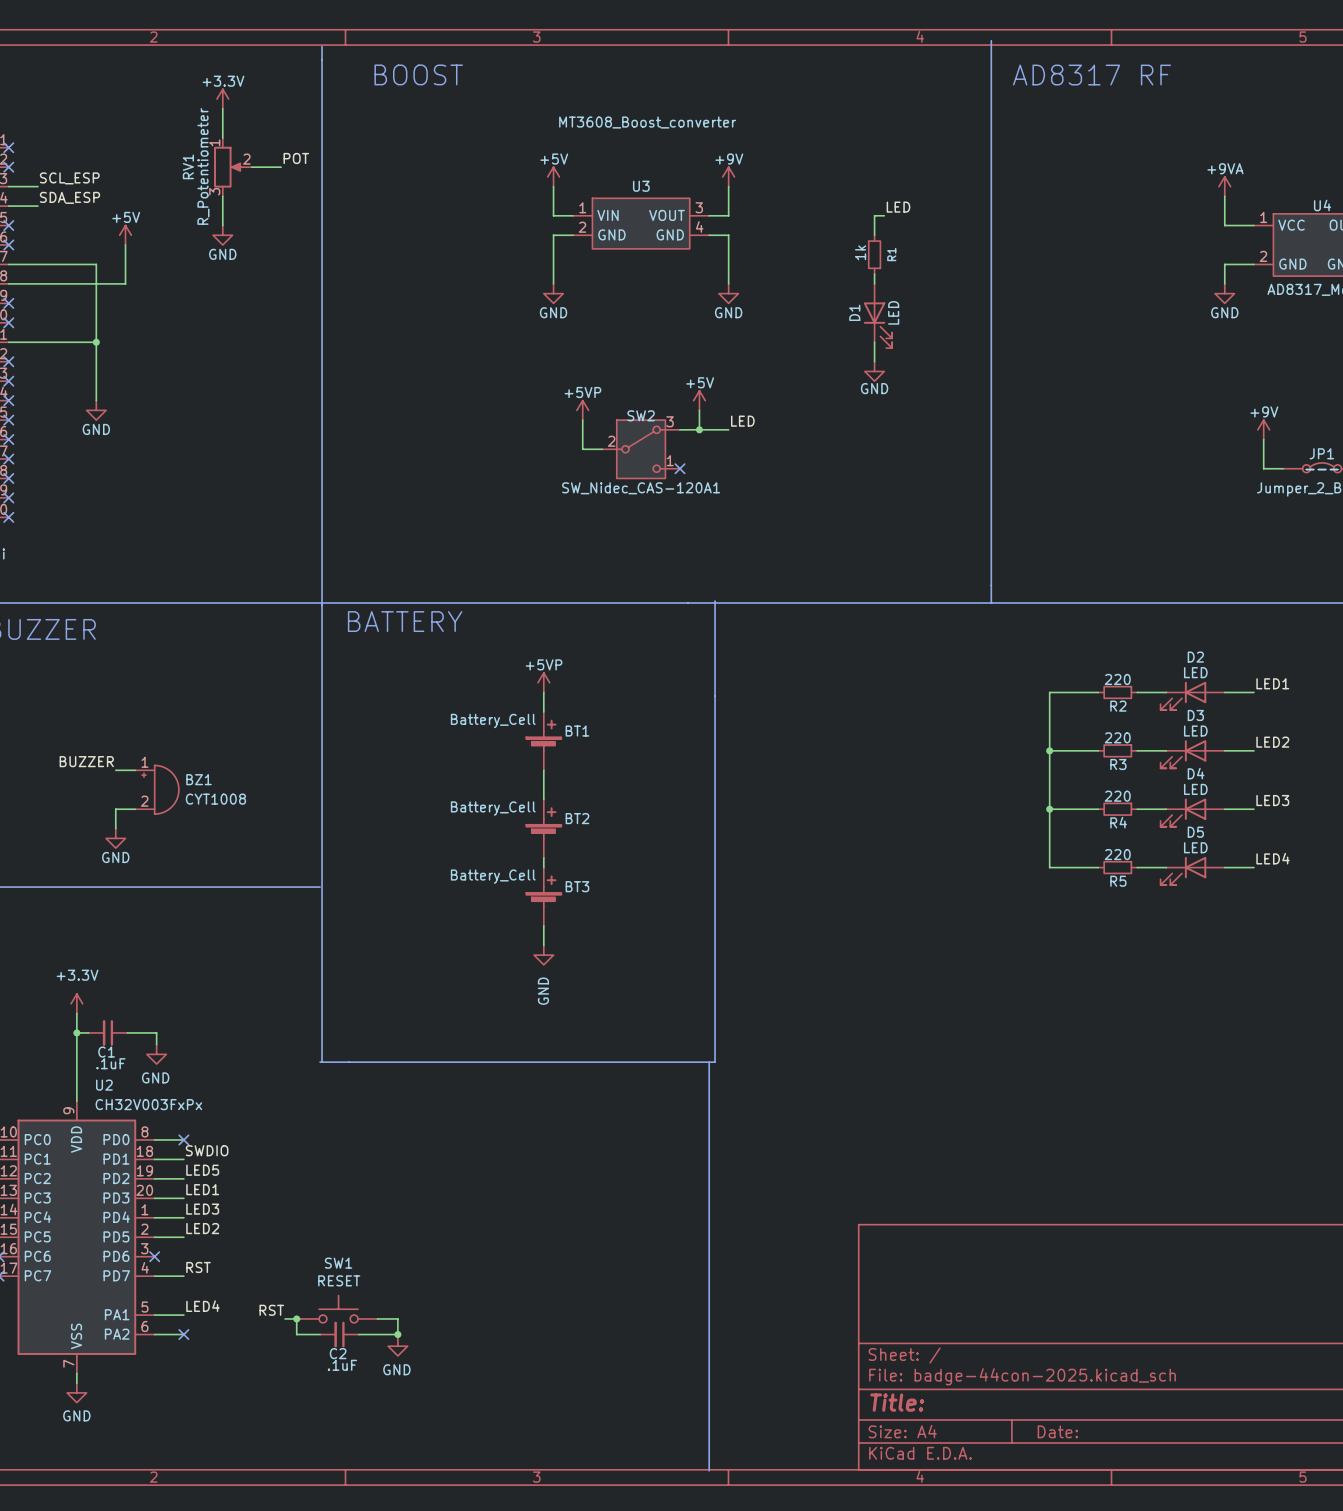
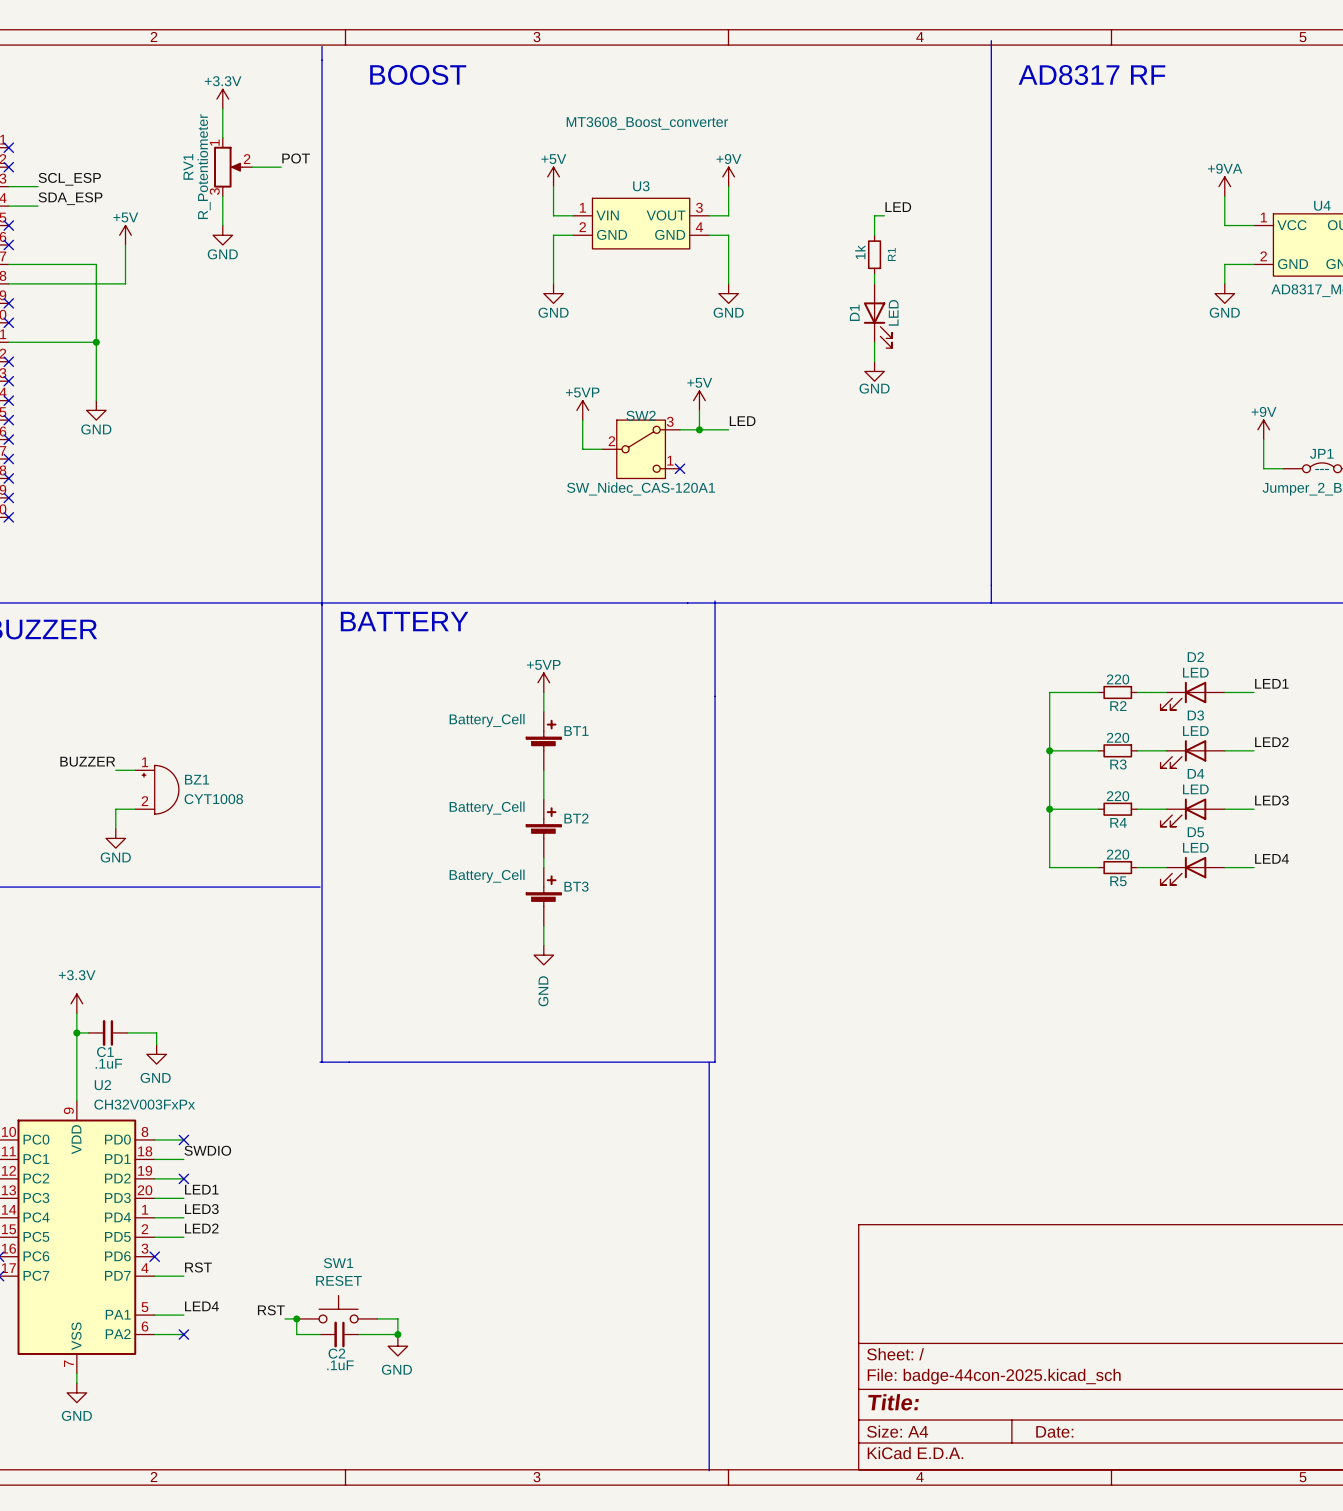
label: LED5 (202, 1170) -> none
no-connect mark: none -> (183, 1178)

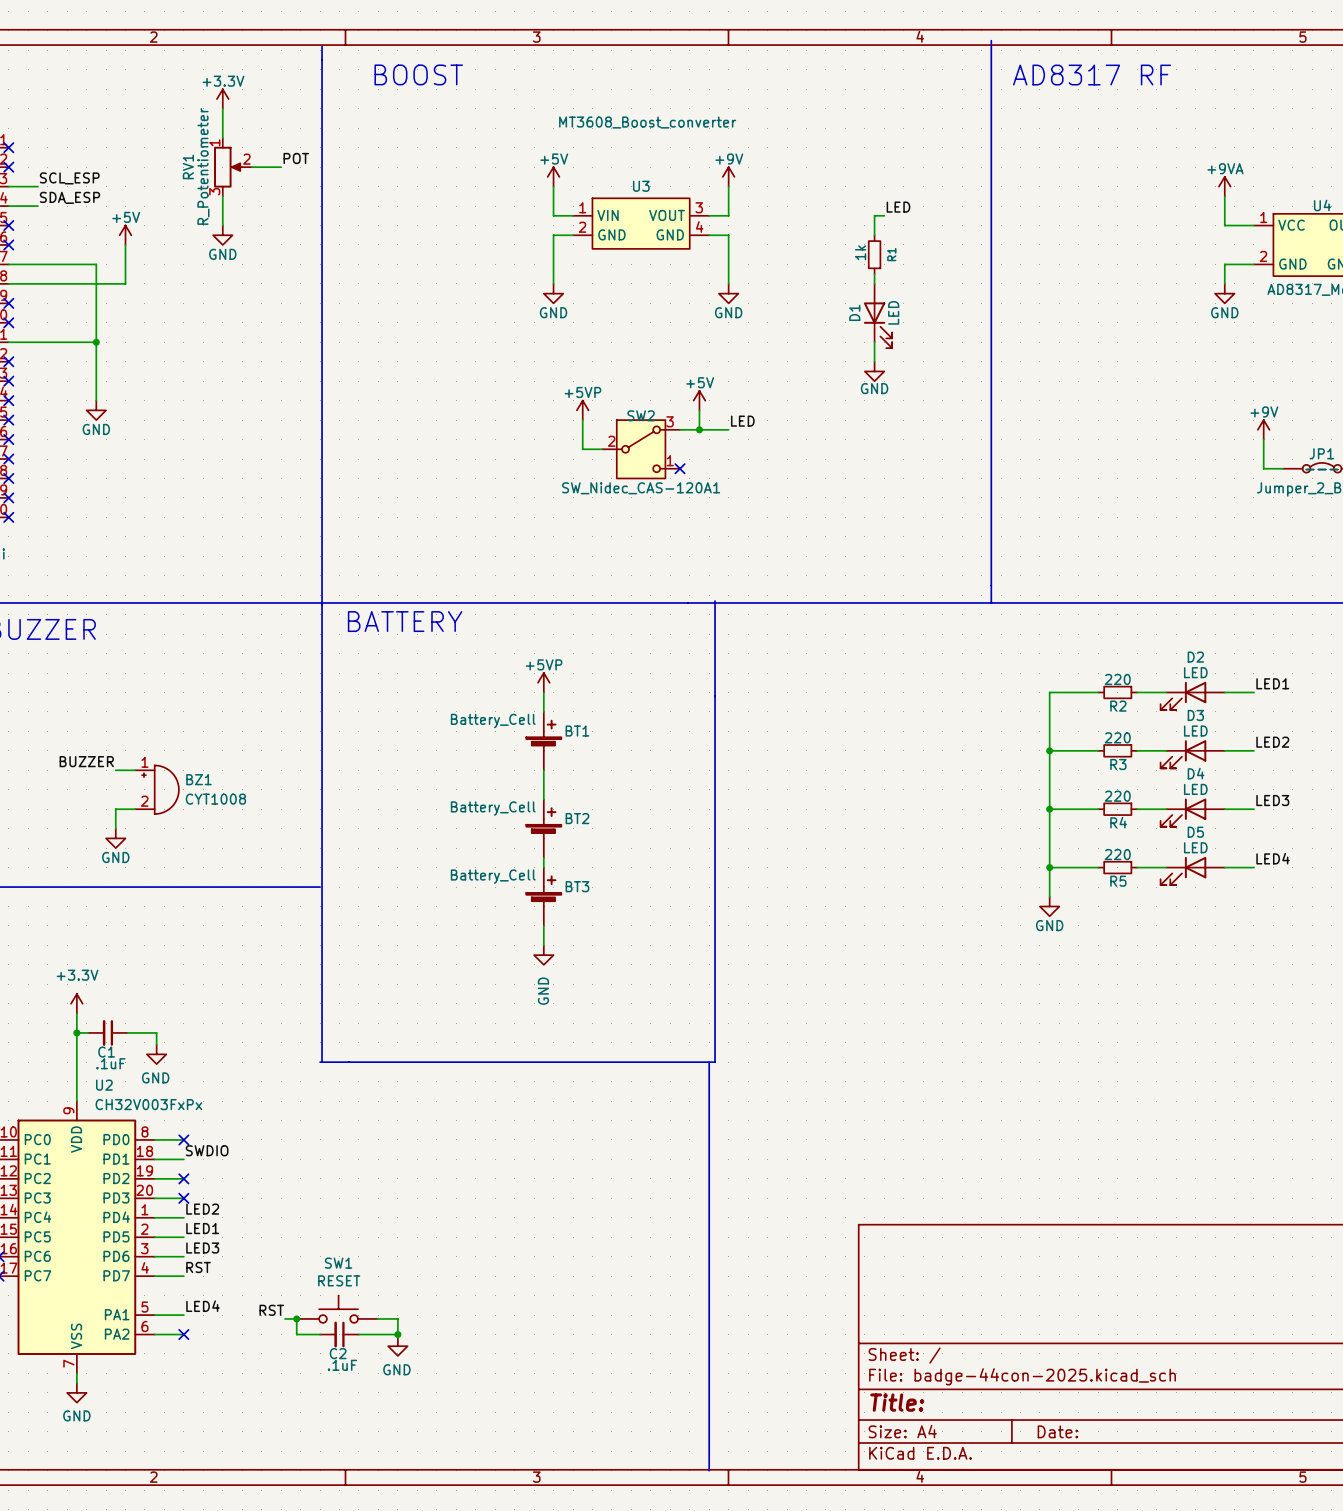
wire: none -> (1049, 867) (1049, 896)
junction: none -> (1049, 867)
power symbol: none -> GND (1049, 906)
label: LED1 (201, 1189) -> none
no-connect mark: none -> (183, 1198)
label: LED3 (201, 1209) -> LED2 (202, 1209)
label: LED2 (201, 1228) -> LED1 (202, 1228)
label: none -> LED3 (202, 1248)
wire: none -> (154, 1256) (183, 1256)
no-connect mark: (154, 1256) -> none

